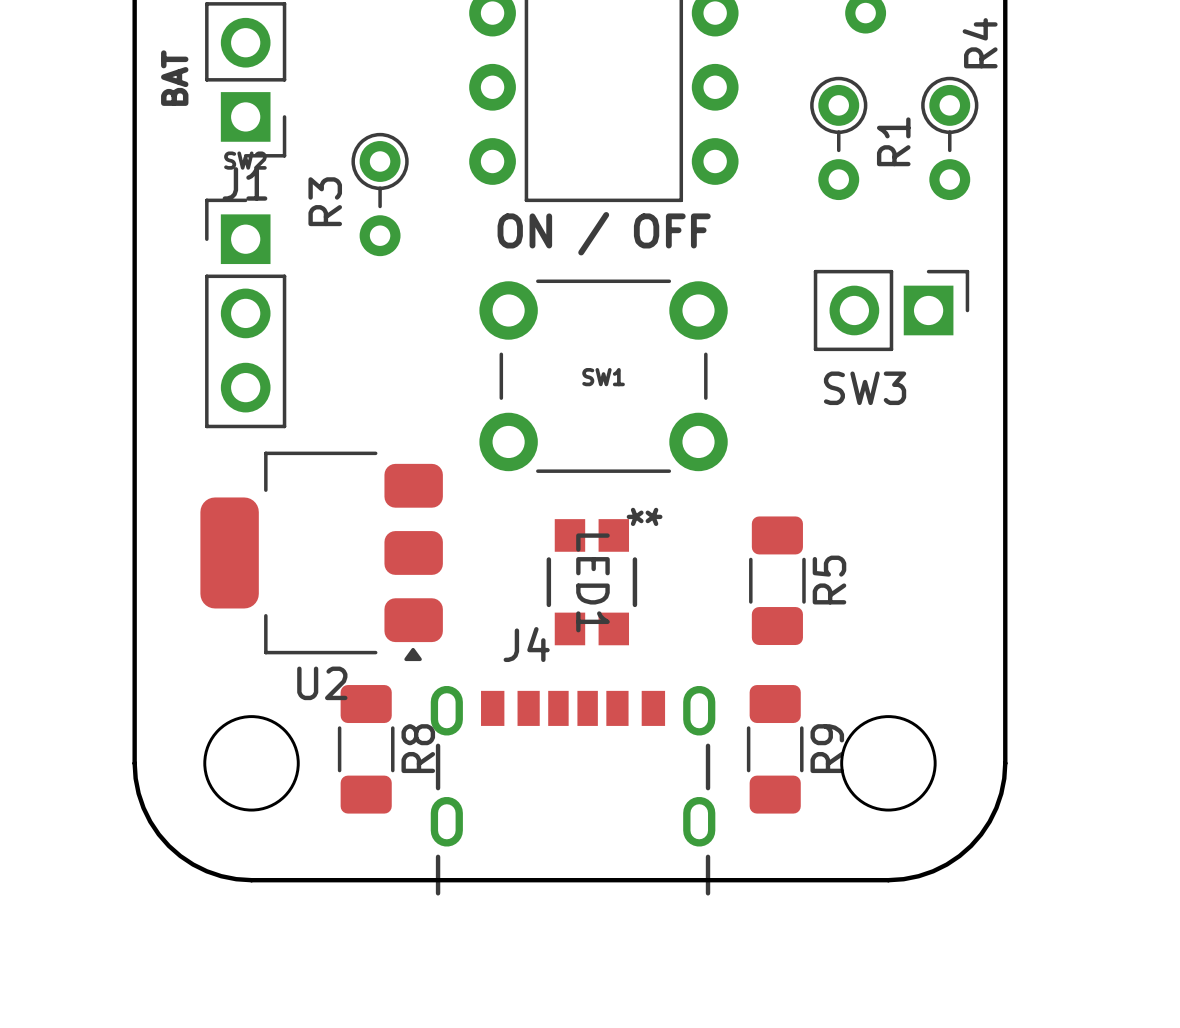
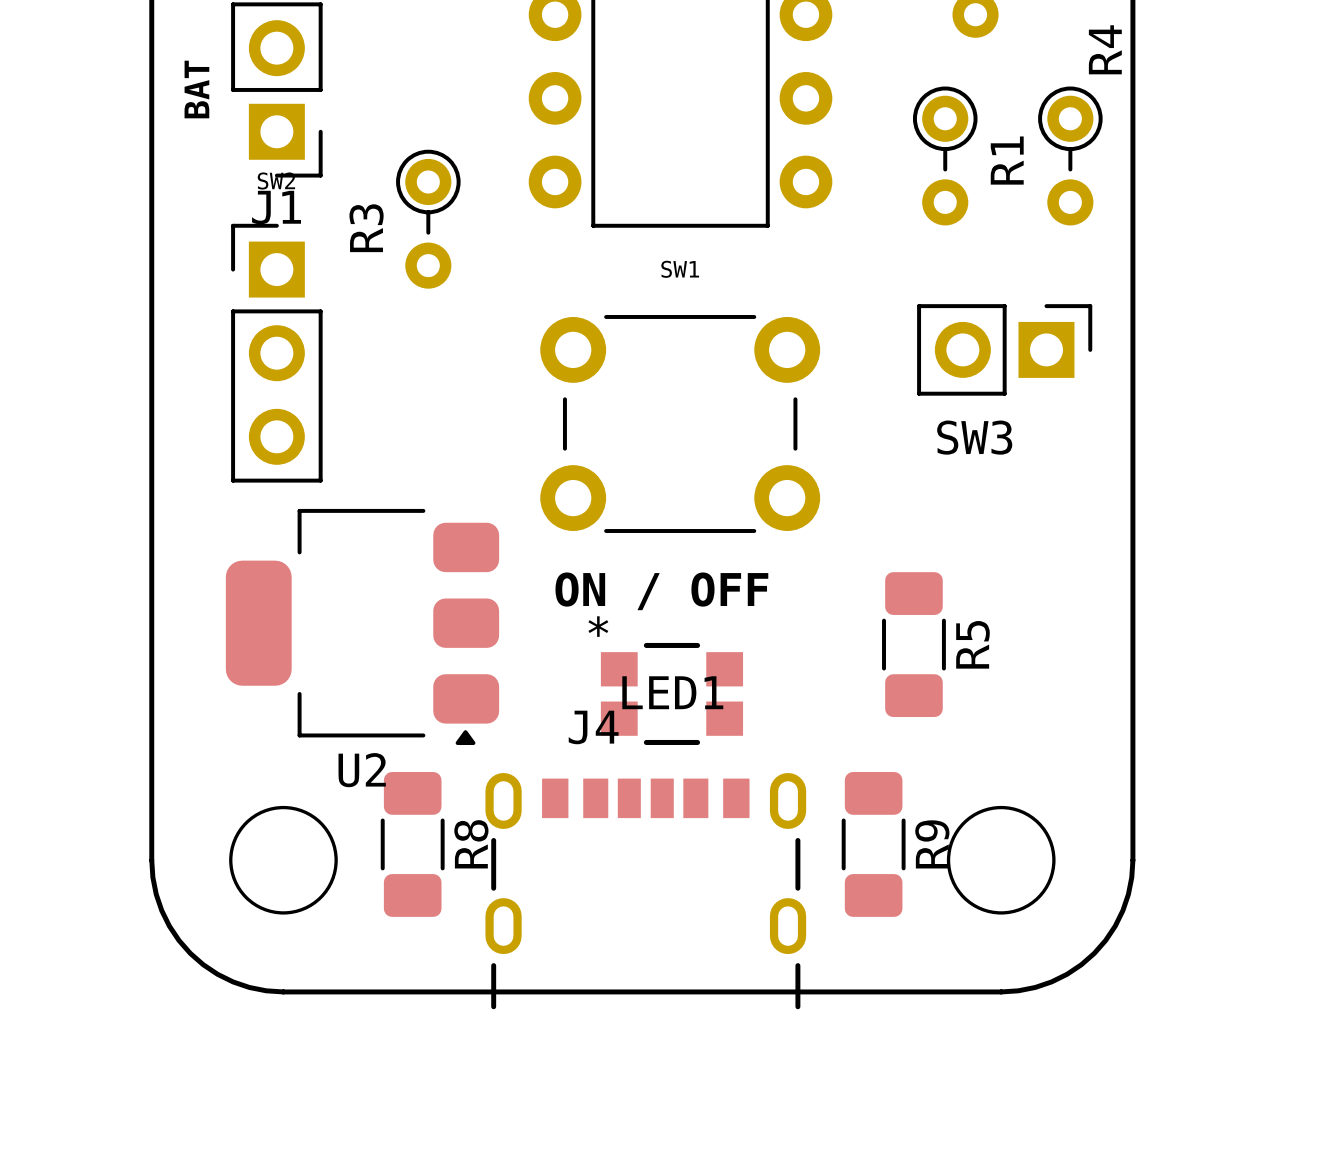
text position: ON / OFF (604, 233) -> ON / OFF (661, 591)
SW1 name position: SW1 (603, 377) -> SW1 (680, 269)
R5 position: (777, 580) -> (913, 644)
LED1 rotation: 0° (591, 582) -> 90° counterclockwise (671, 693)

